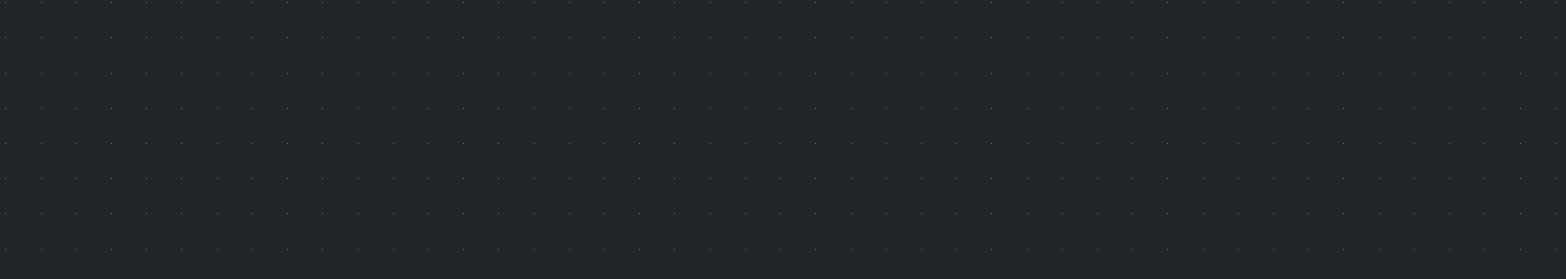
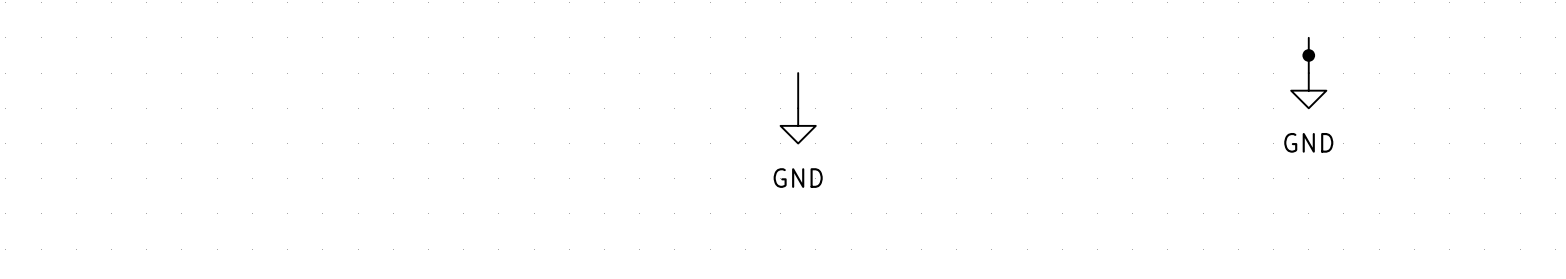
wire: none -> (1308, 37) (1308, 73)
junction: none -> (1308, 55)
wire: none -> (798, 73) (798, 108)
power symbol: none -> GND (1308, 90)
power symbol: none -> GND (798, 125)

